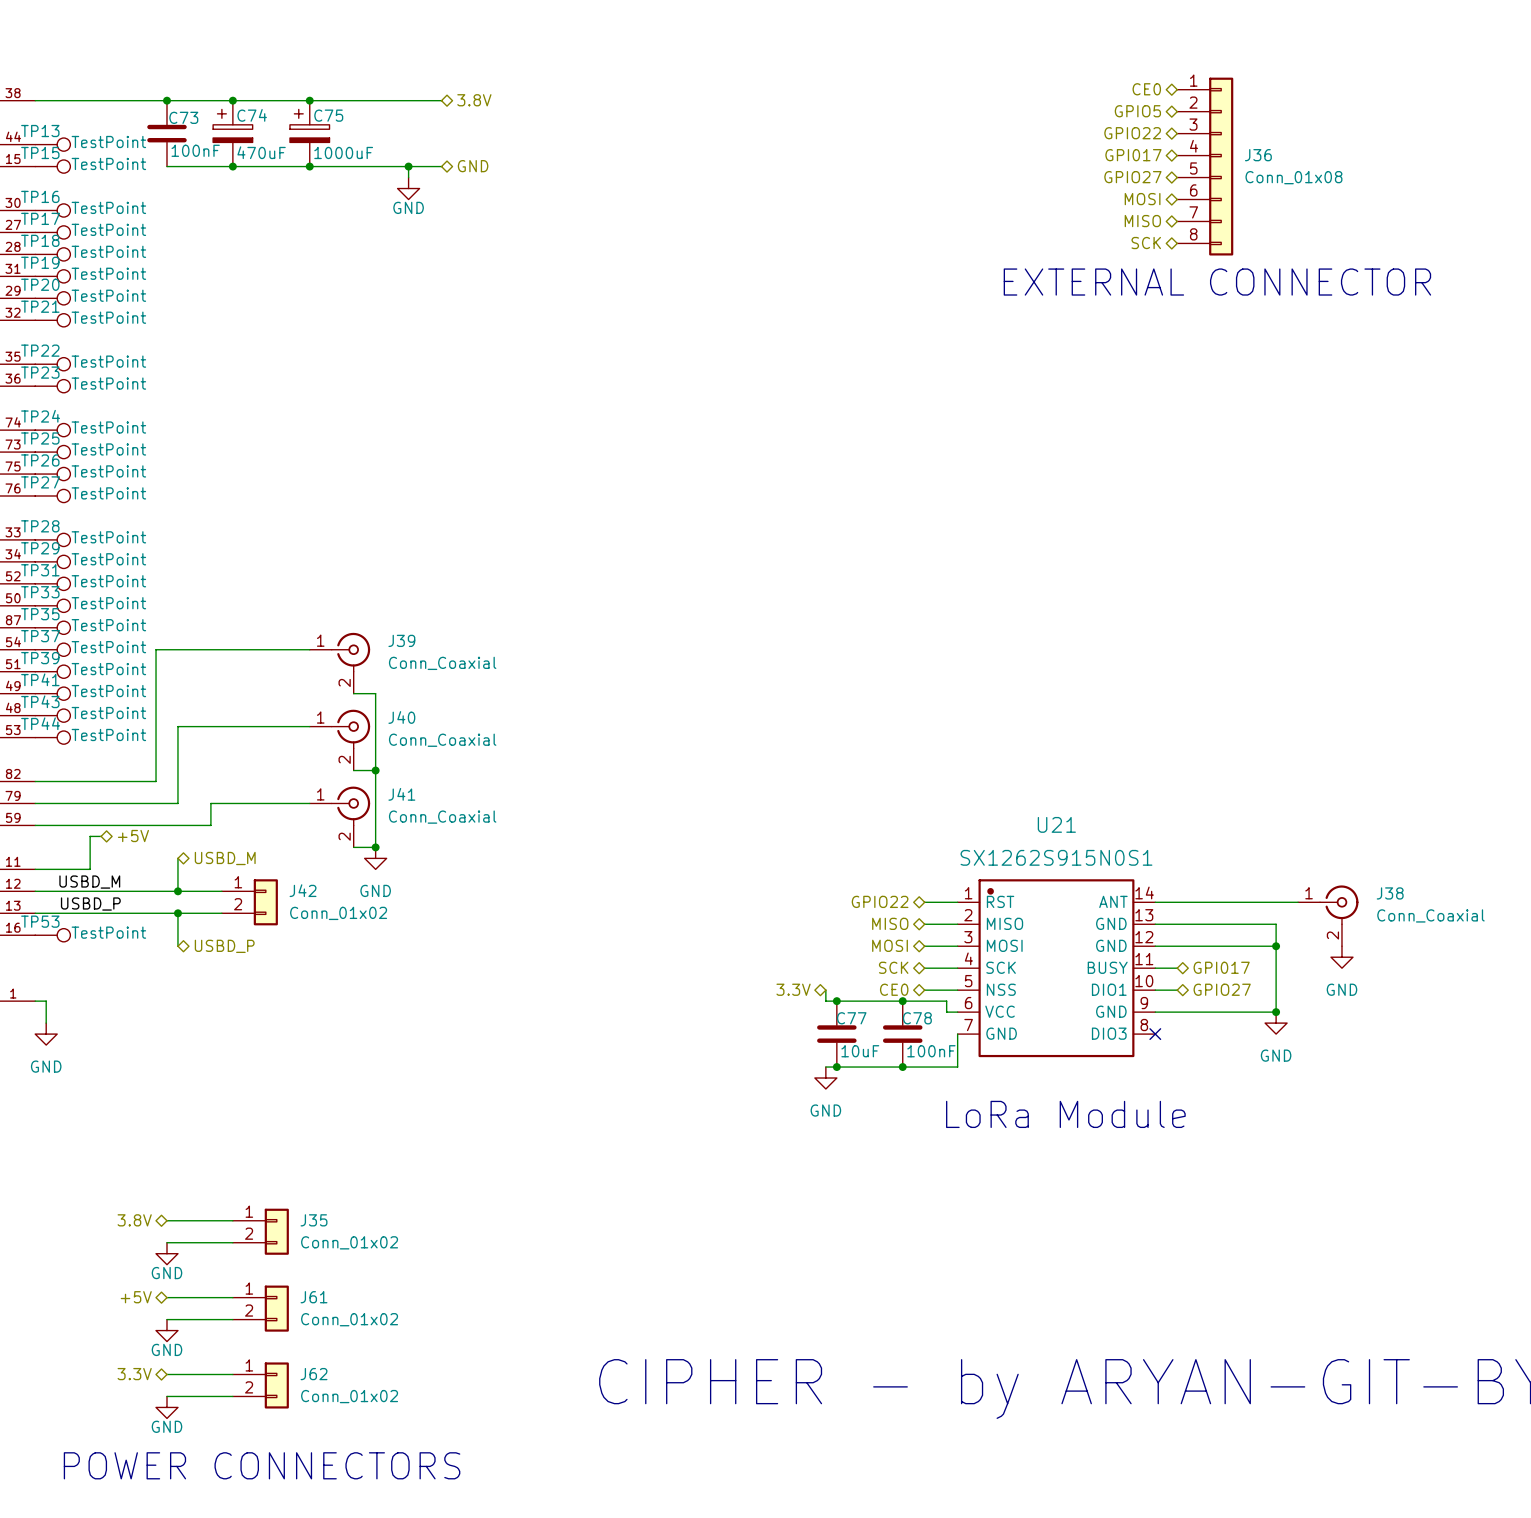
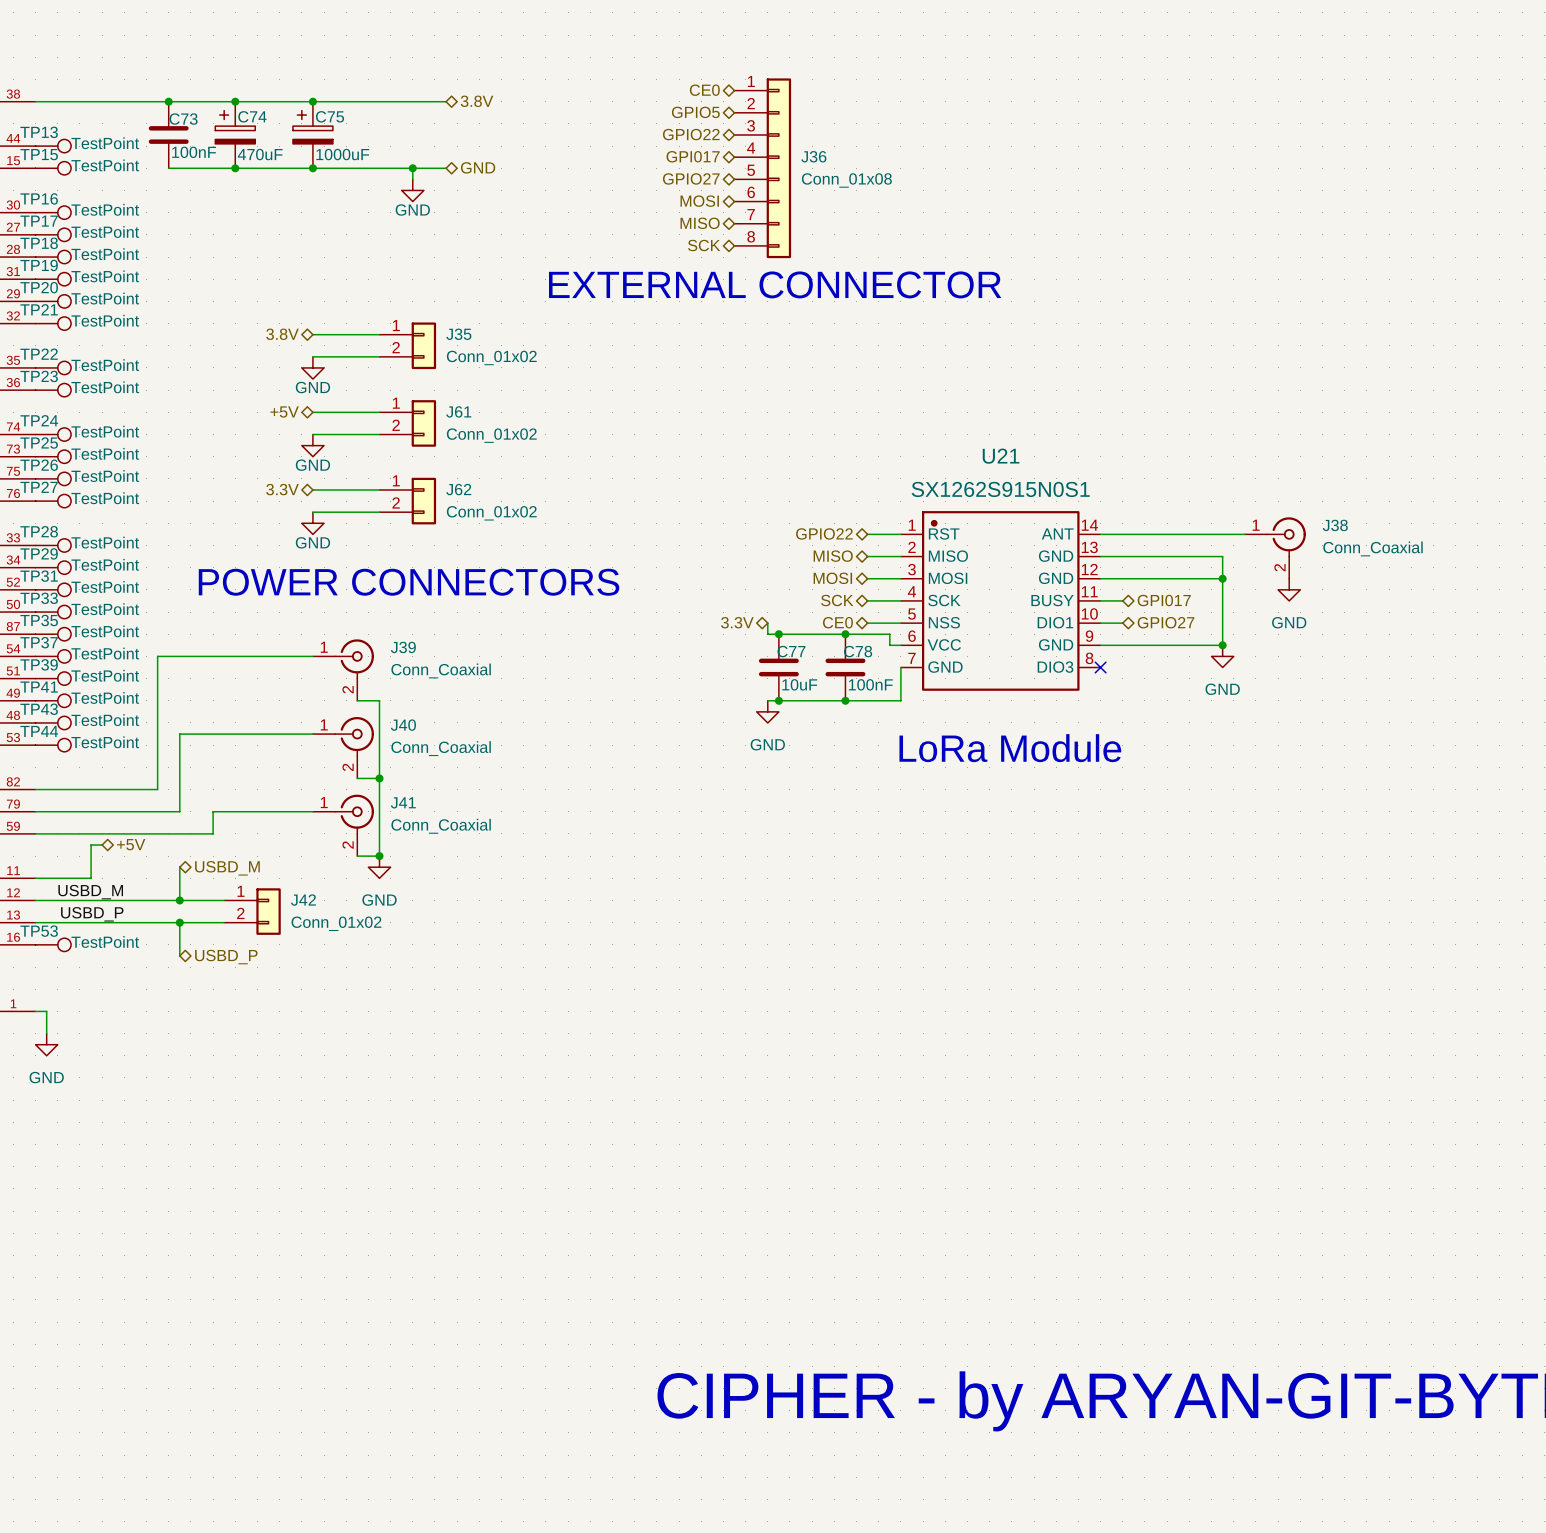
hierarchical label: none -> CE0 (704, 90)
hierarchical label: CE0 (1146, 89) -> none
hierarchical label: none -> GPIO5 (695, 112)
hierarchical label: GPIO5 (1137, 111) -> none
hierarchical label: none -> GPIO22 (691, 134)
hierarchical label: GPIO22 (1132, 133) -> none
hierarchical label: none -> GPI017 (693, 156)
hierarchical label: GPI017 (1133, 155) -> none
J36 position: (1205, 166) -> (762, 168)
hierarchical label: none -> GPIO27 (691, 178)
hierarchical label: GPIO27 (1132, 177) -> none
hierarchical label: none -> MOSI (699, 201)
hierarchical label: MOSI (1142, 199) -> none
hierarchical label: none -> MISO (700, 223)
hierarchical label: MISO (1142, 221) -> none
hierarchical label: none -> SCK (704, 245)
hierarchical label: SCK (1146, 243) -> none
text: none -> EXTERNAL CONNECTOR (775, 284)
text: EXTERNAL CONNECTOR (1217, 282) -> none
hierarchical label: none -> 3.8V (282, 334)
wire: none -> (312, 334) (379, 334)
wire: none -> (312, 356) (379, 356)
power symbol: none -> GND (312, 367)
hierarchical label: none -> +5V (284, 412)
wire: none -> (312, 412) (379, 412)
wire: none -> (312, 434) (379, 434)
power symbol: none -> GND (312, 445)
hierarchical label: none -> 3.3V (282, 489)
wire: none -> (312, 490) (379, 490)
wire: none -> (312, 512) (379, 512)
power symbol: none -> GND (312, 523)
hierarchical label: none -> GPIO22 (824, 533)
wire: none -> (867, 534) (900, 534)
wire: none -> (1100, 534) (1244, 534)
hierarchical label: none -> MISO (833, 556)
wire: none -> (867, 556) (900, 556)
wire: none -> (1100, 556) (1222, 556) (1222, 645) (1100, 645)
hierarchical label: none -> MOSI (832, 578)
wire: none -> (867, 578) (900, 578)
wire: none -> (1100, 578) (1222, 578)
junction: none -> (1222, 578)
text: none -> POWER CONNECTORS (409, 582)
power symbol: none -> GND (1289, 589)
hierarchical label: none -> SCK (837, 600)
wire: none -> (867, 600) (900, 600)
wire: none -> (1100, 600) (1122, 600)
hierarchical label: none -> GPI017 (1164, 600)
hierarchical label: none -> 3.3V (737, 622)
wire: none -> (767, 623) (767, 634) (889, 634) (889, 645) (900, 645)
hierarchical label: none -> CE0 (837, 622)
wire: none -> (867, 623) (900, 623)
wire: none -> (1100, 623) (1122, 623)
hierarchical label: none -> GPIO27 (1166, 622)
junction: none -> (778, 634)
junction: none -> (845, 634)
junction: none -> (1222, 645)
power symbol: none -> GND (1222, 656)
wire: none -> (900, 667) (900, 700) (767, 700)
no-connect mark: none -> (1100, 667)
junction: none -> (778, 700)
junction: none -> (845, 700)
power symbol: none -> GND (767, 711)
text: none -> LoRa Module (1010, 748)
hierarchical label: GPIO22 (880, 901) -> none
wire: (924, 902) (957, 902) -> none
wire: (1155, 902) (1298, 902) -> none
J38 position: (1328, 915) -> (1275, 548)
hierarchical label: MISO (890, 923) -> none
wire: (924, 924) (957, 924) -> none
wire: (1155, 924) (1276, 924) (1276, 1012) (1155, 1012) -> none
hierarchical label: MOSI (890, 945) -> none
wire: (924, 946) (957, 946) -> none
wire: (1155, 946) (1276, 946) -> none
junction: (1276, 946) -> none
power symbol: GND (1341, 957) -> none
hierarchical label: SCK (893, 967) -> none
hierarchical label: GPI017 (1221, 967) -> none
wire: (924, 968) (957, 968) -> none
U21 position: (1056, 968) -> (1000, 600)
wire: (1155, 968) (1177, 968) -> none
hierarchical label: 3.3V (793, 989) -> none
hierarchical label: CE0 (894, 989) -> none
hierarchical label: GPIO27 (1222, 989) -> none
wire: (825, 990) (825, 1001) (946, 1001) (946, 1012) (957, 1012) -> none
wire: (924, 990) (957, 990) -> none
wire: (1155, 990) (1177, 990) -> none
junction: (836, 1001) -> none
junction: (902, 1001) -> none
junction: (1276, 1012) -> none
power symbol: GND (1276, 1023) -> none
C77 position: (836, 1034) -> (778, 667)
C78 position: (902, 1034) -> (845, 667)
wire: (957, 1034) (957, 1067) (825, 1067) -> none
no-connect mark: (1155, 1034) -> none
junction: (836, 1067) -> none
junction: (902, 1067) -> none
power symbol: GND (825, 1078) -> none
text: LoRa Module (1065, 1114) -> none
hierarchical label: 3.8V (134, 1220) -> none
wire: (166, 1220) (232, 1220) -> none
J35 position: (260, 1231) -> (407, 345)
wire: (166, 1242) (232, 1242) -> none
power symbol: GND (166, 1253) -> none
hierarchical label: +5V (136, 1297) -> none
wire: (166, 1297) (232, 1297) -> none
J61 position: (260, 1308) -> (407, 423)
wire: (166, 1319) (232, 1319) -> none
power symbol: GND (166, 1330) -> none
hierarchical label: 3.3V (134, 1374) -> none
wire: (166, 1374) (232, 1374) -> none
J62 position: (260, 1385) -> (407, 501)
wire: (166, 1396) (232, 1396) -> none
power symbol: GND (166, 1407) -> none
text: POWER CONNECTORS (262, 1465) -> none

